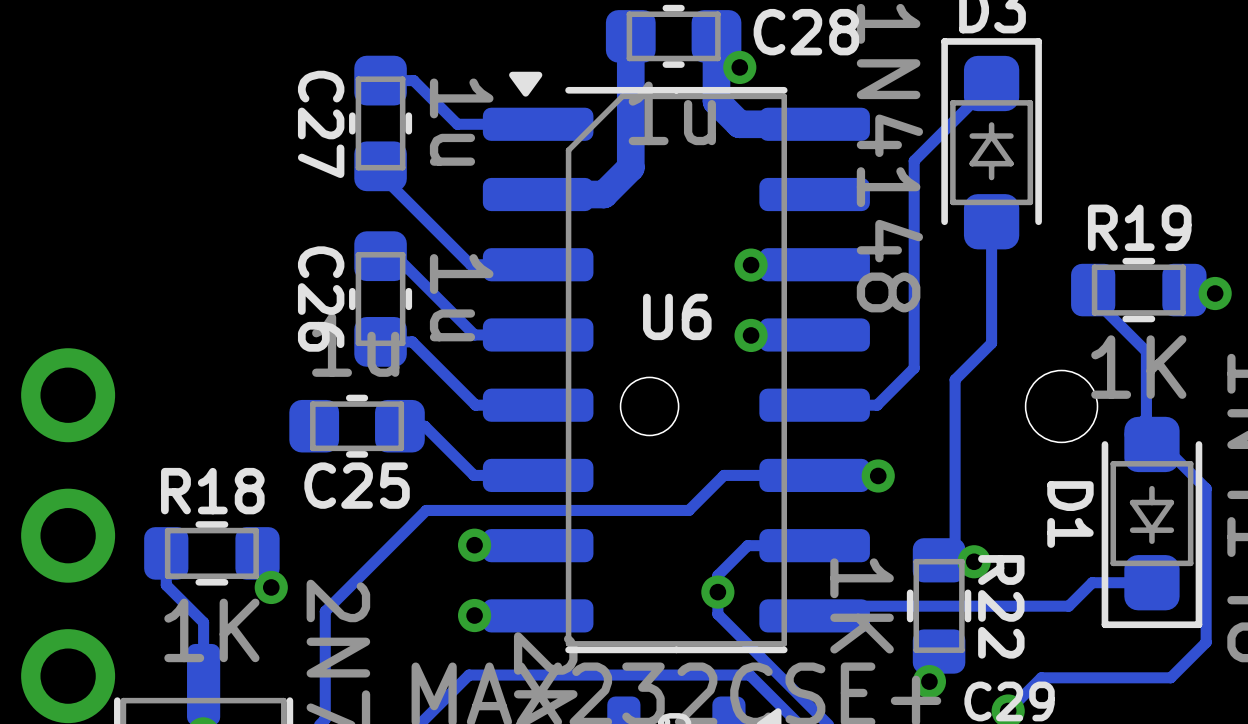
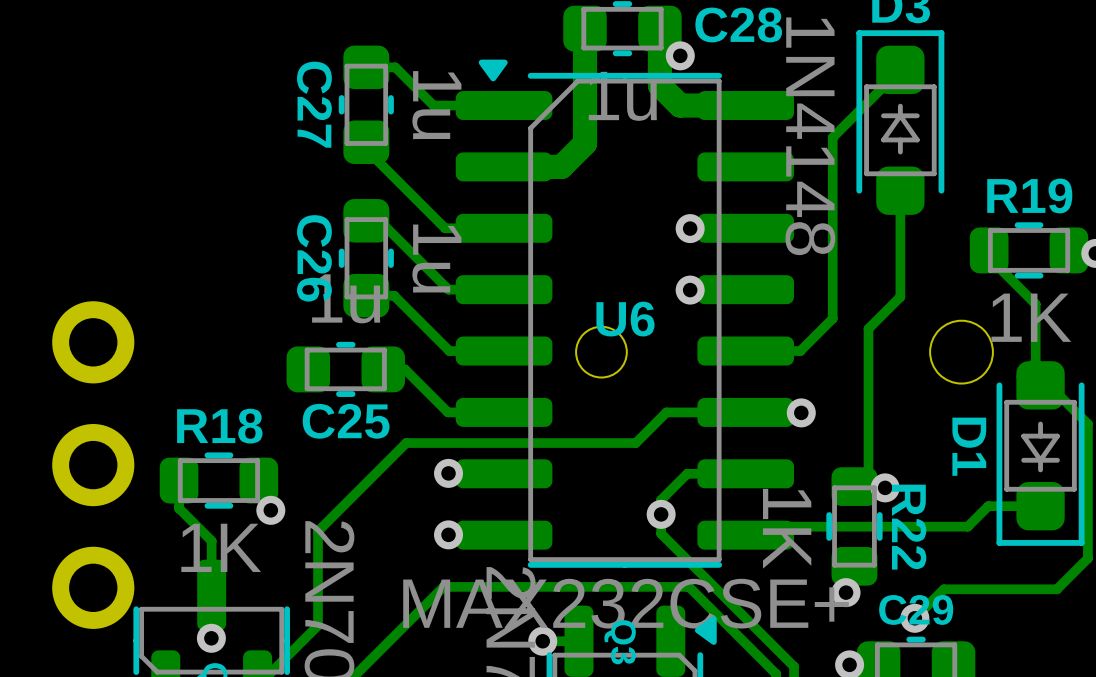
U6 name position: U6 (677, 316) -> U6 (625, 319)

